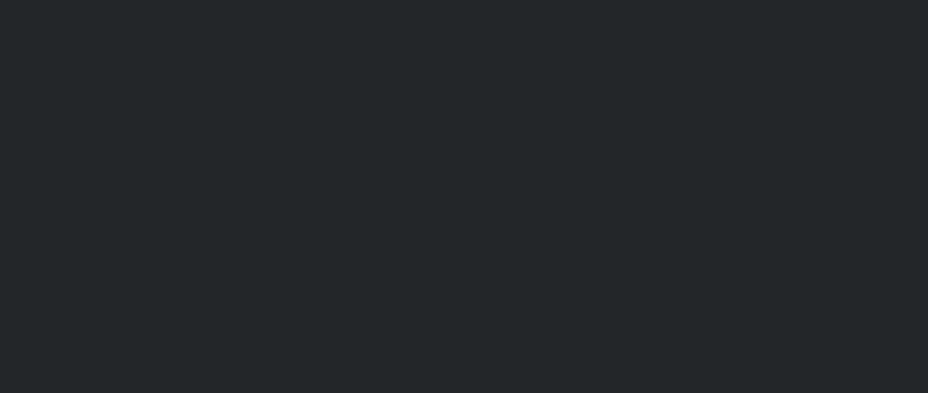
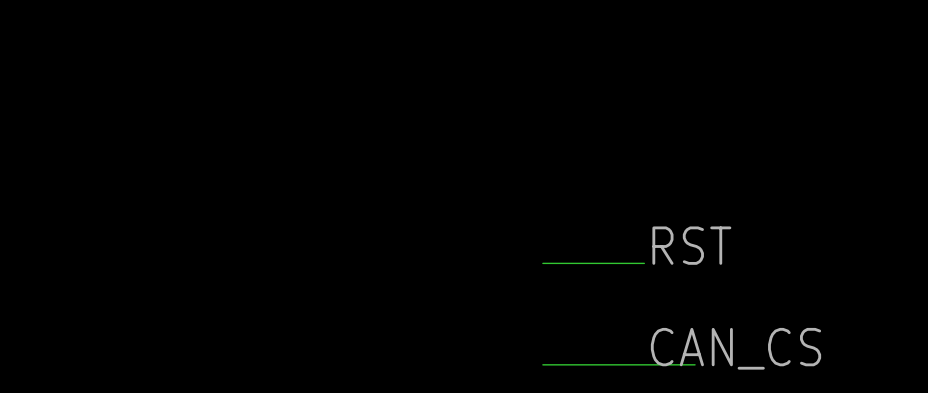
label: none -> RST (691, 245)
wire: none -> (542, 263) (644, 263)
label: none -> CAN_CS (735, 348)
wire: none -> (542, 364) (695, 364)

